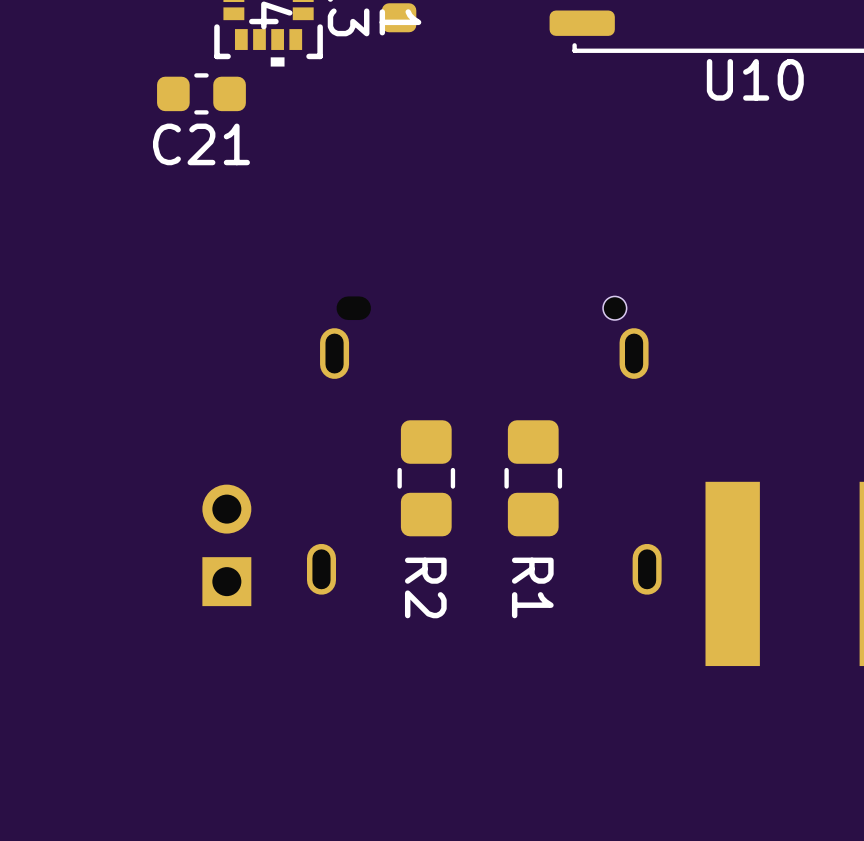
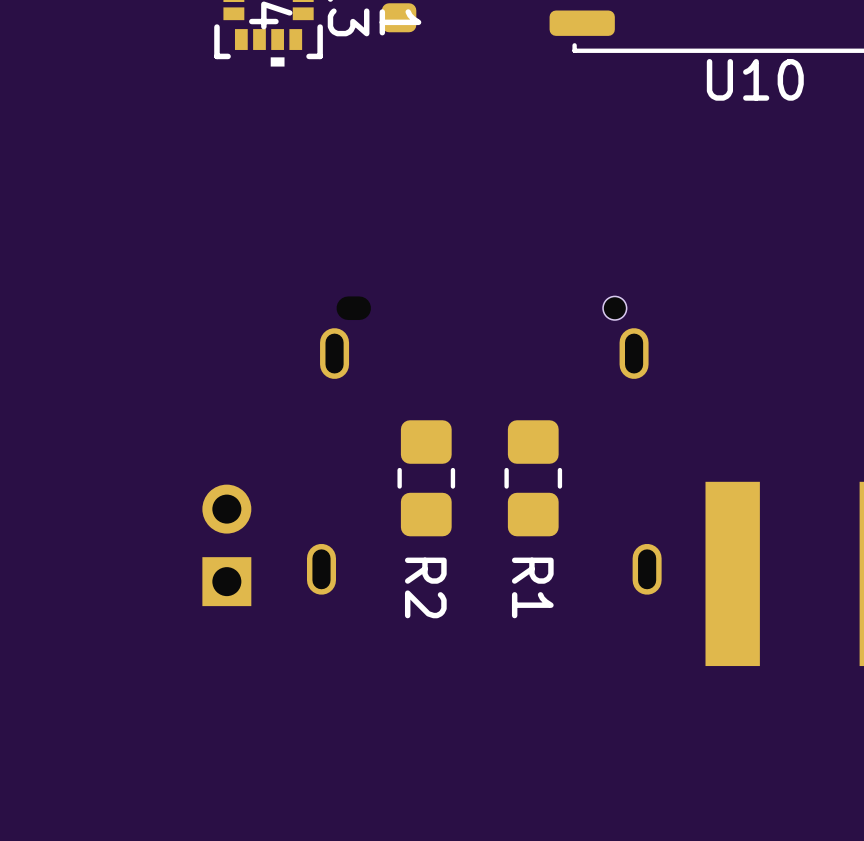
C21: (201, 93) -> none

